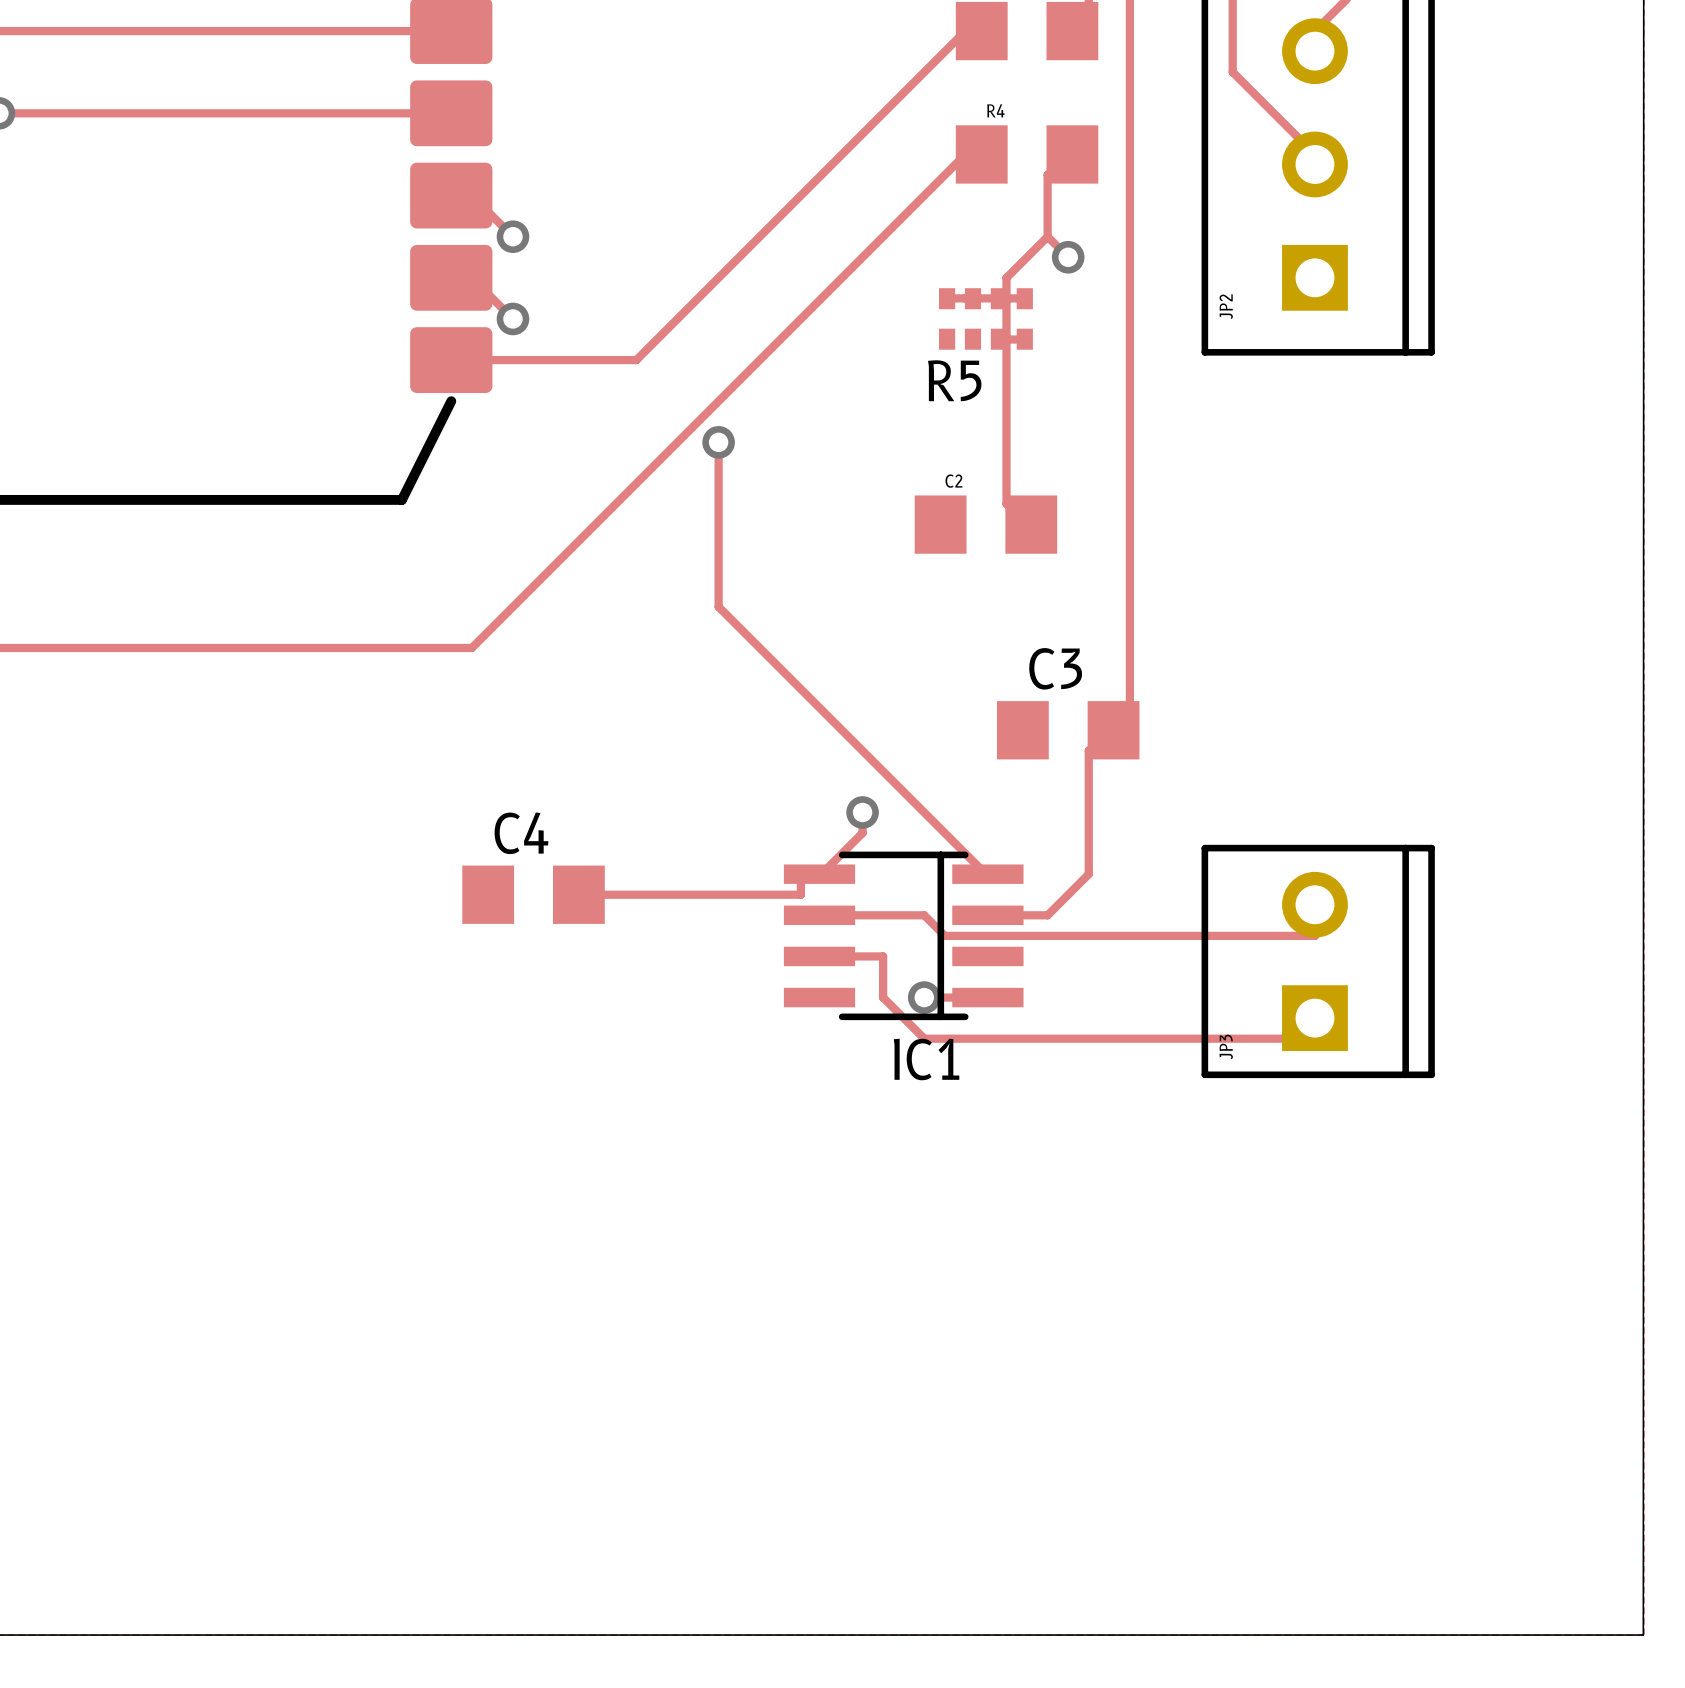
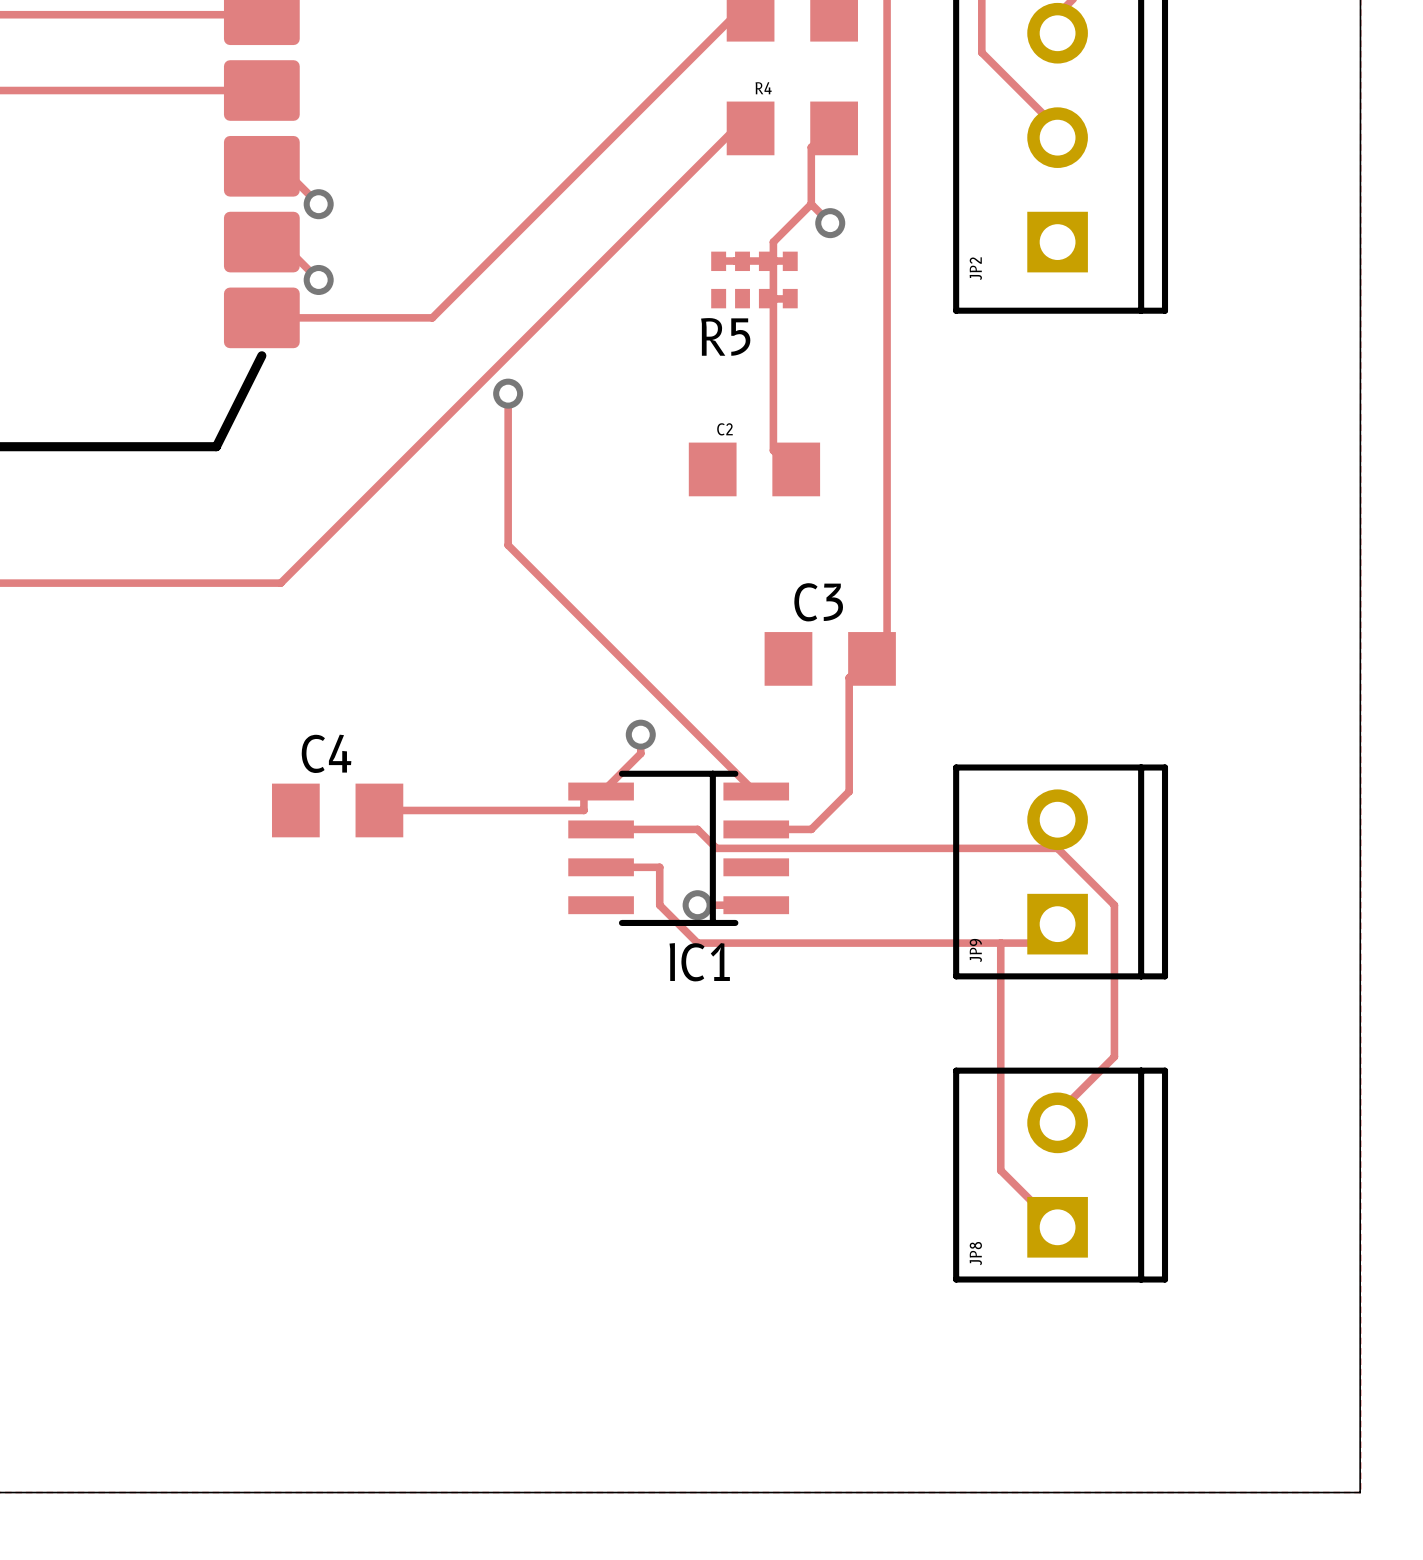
track: none -> (1057, 848) (1114, 905) (1114, 1056) (1057, 1113) (1057, 1122)
track: none -> (1000, 943) (1000, 1170) (1057, 1227)
JP3 name: JP3 (1226, 1046) -> JP9 (975, 950)
JP8: none -> (1060, 1175)

